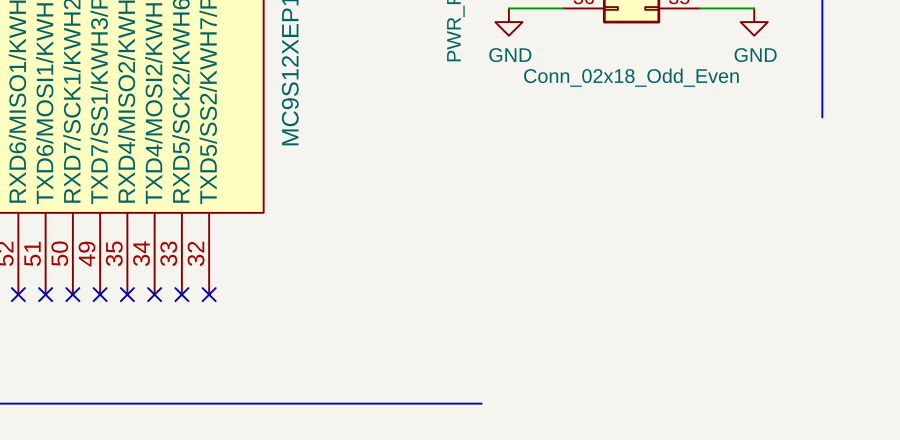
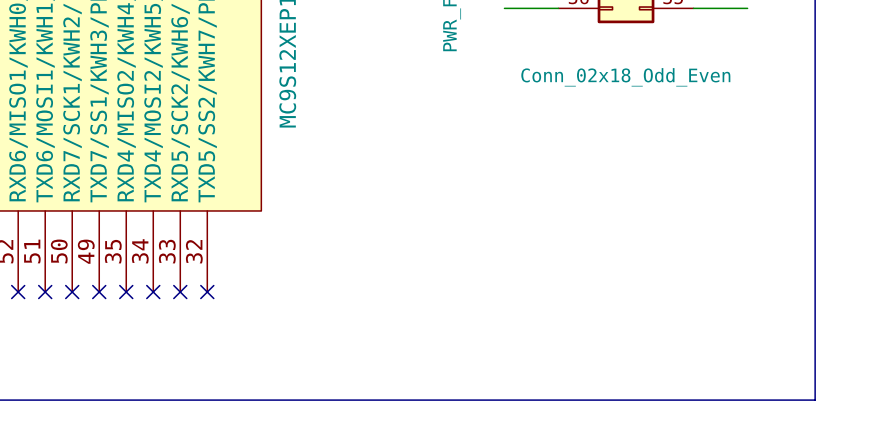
power symbol: GND (508, 22) -> none
power symbol: GND (754, 22) -> none
bus: none -> (815, 116) (815, 400) (477, 400)

